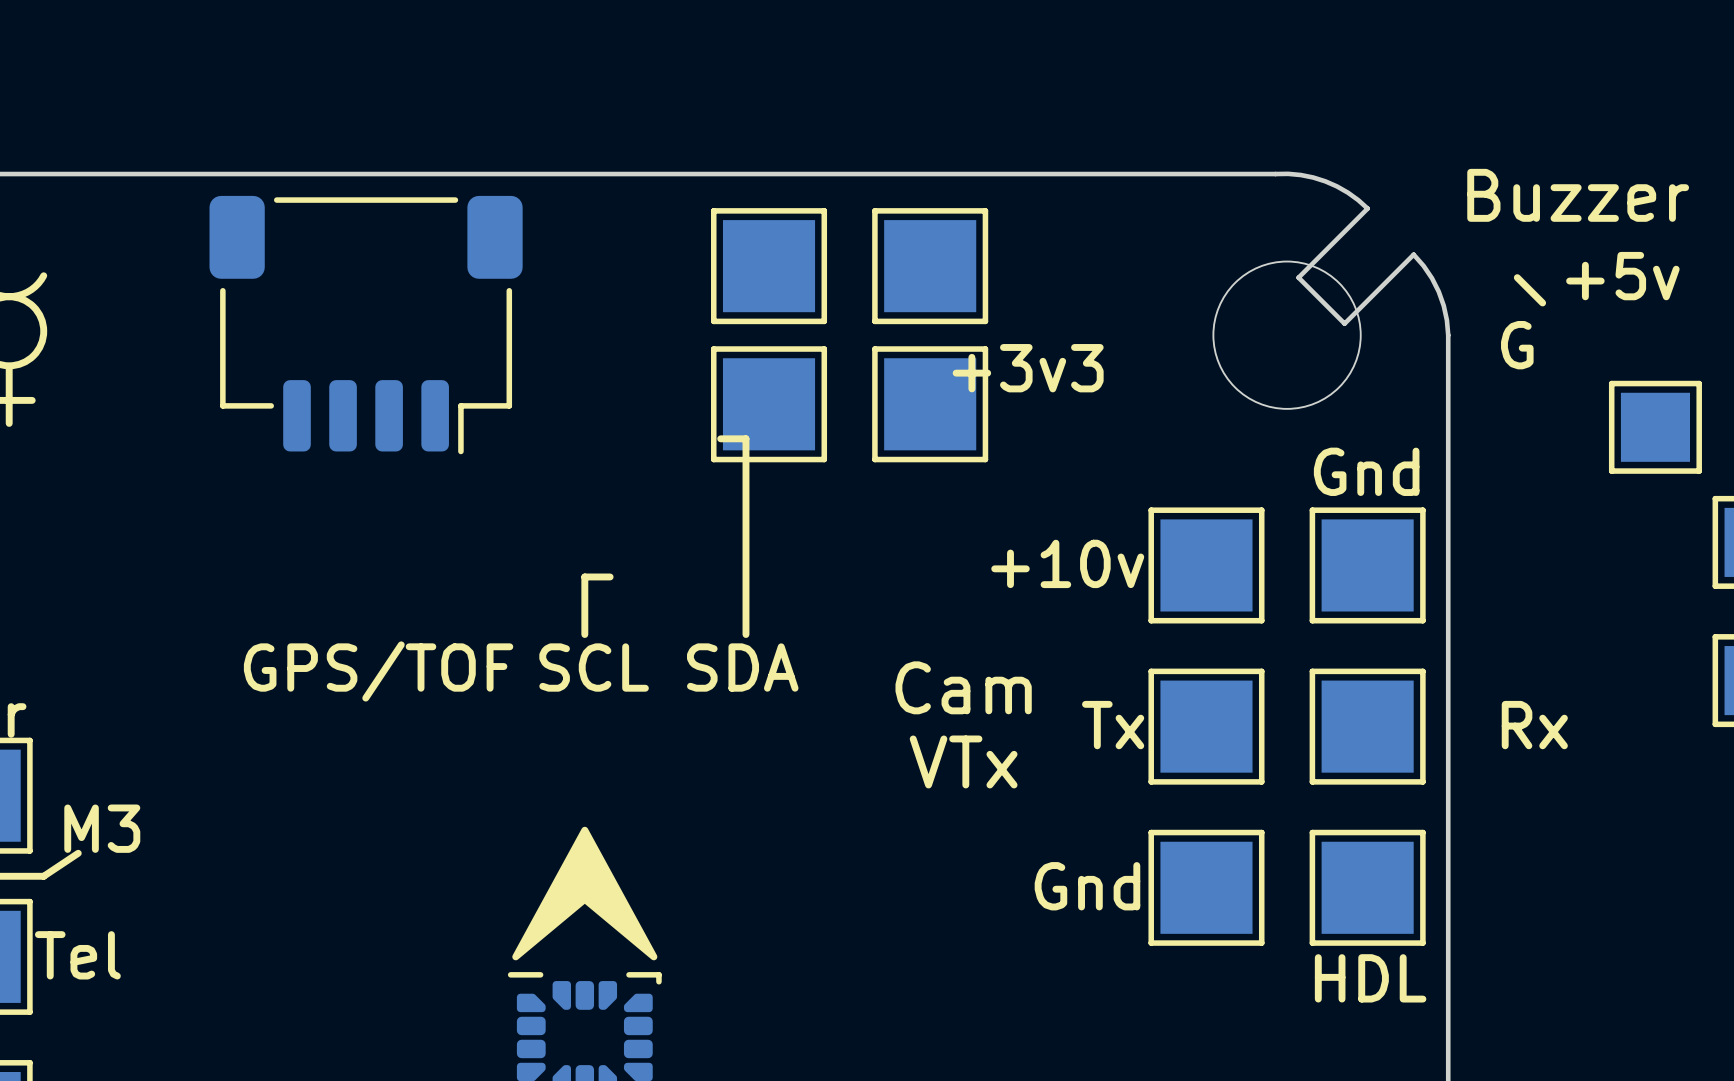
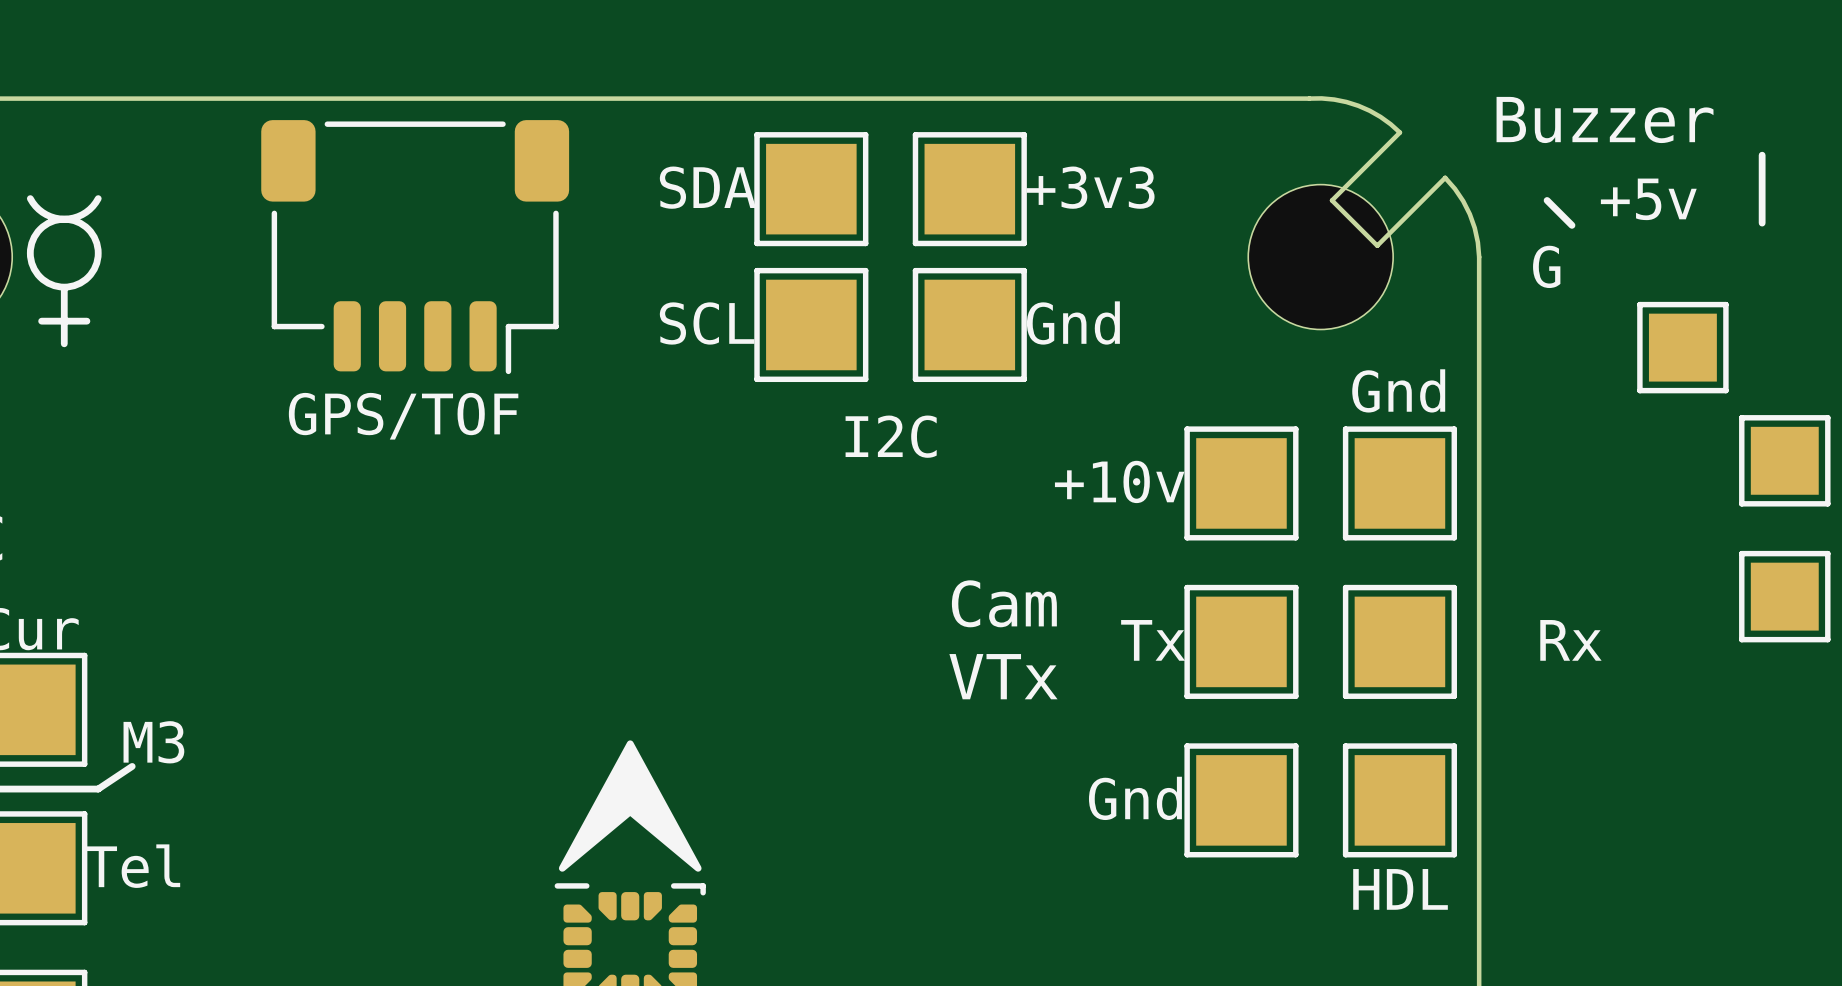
text position: +3v3 (1028, 368) -> +3v3 (1090, 187)
text: none -> Gnd (1073, 322)
line: (720, 438) (745, 438) (745, 634) -> none
text: none -> I2C (891, 436)
line: (610, 576) (584, 576) (584, 634) -> none
text position: SCL (594, 667) -> SCL (707, 323)
text position: SDA (742, 667) -> SDA (707, 187)
text position: GPS/TOF (378, 671) -> GPS/TOF (403, 416)

